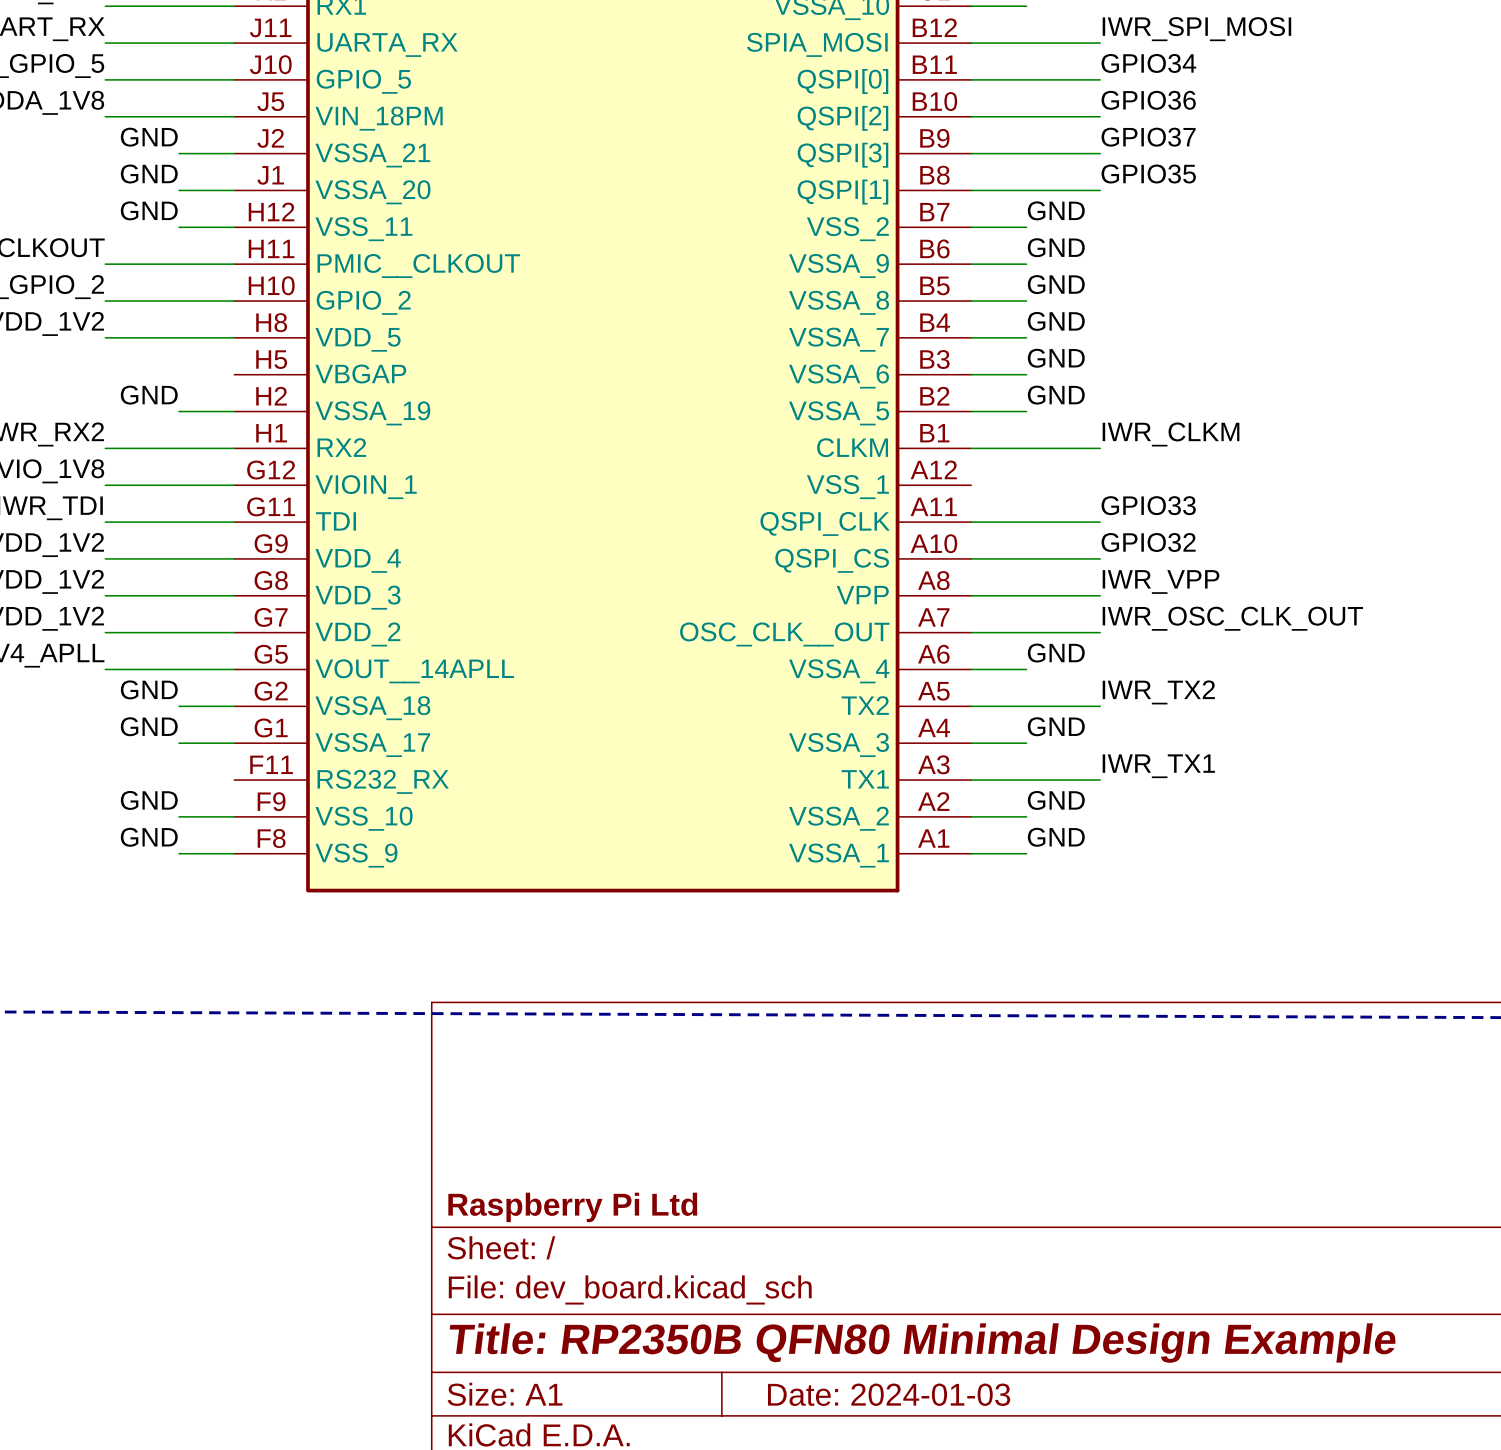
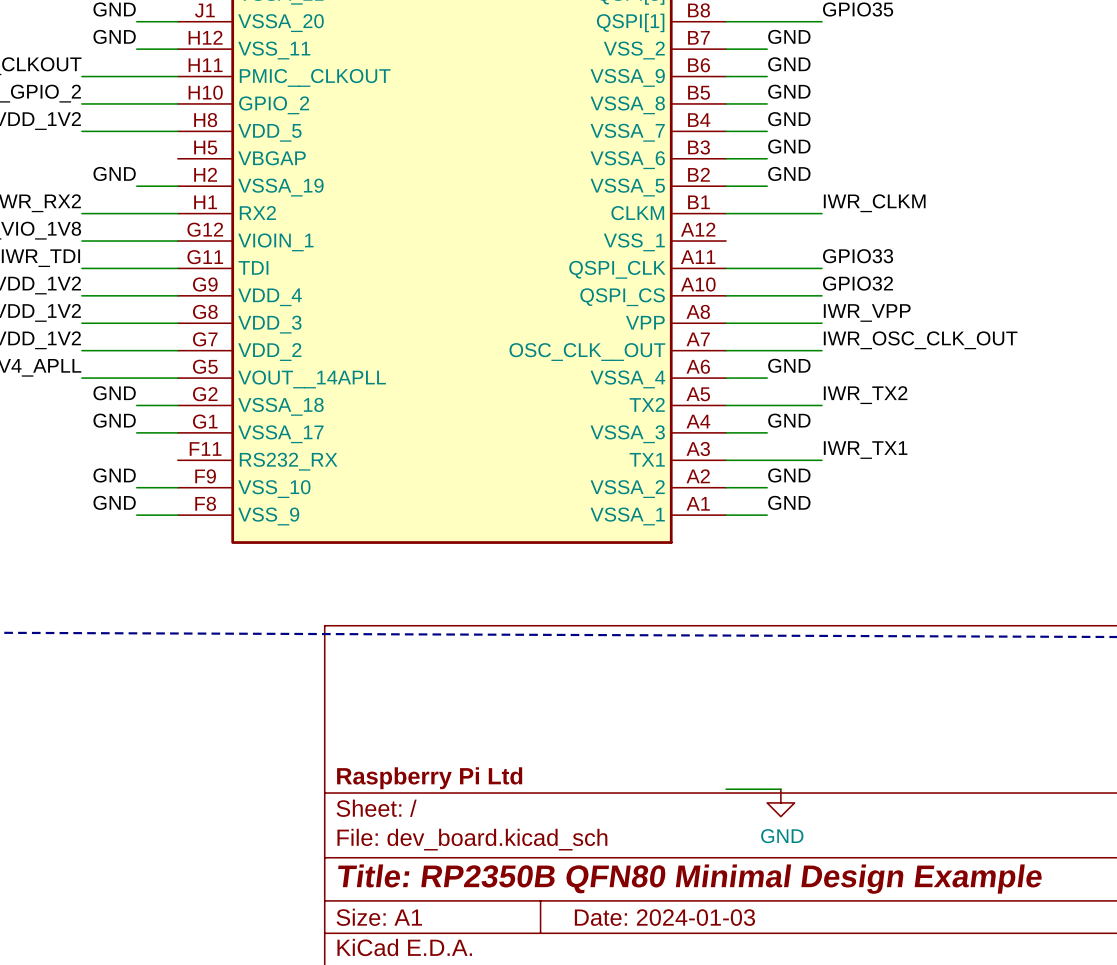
wire: none -> (726, 789) (780, 789)
power symbol: none -> GND (780, 802)

